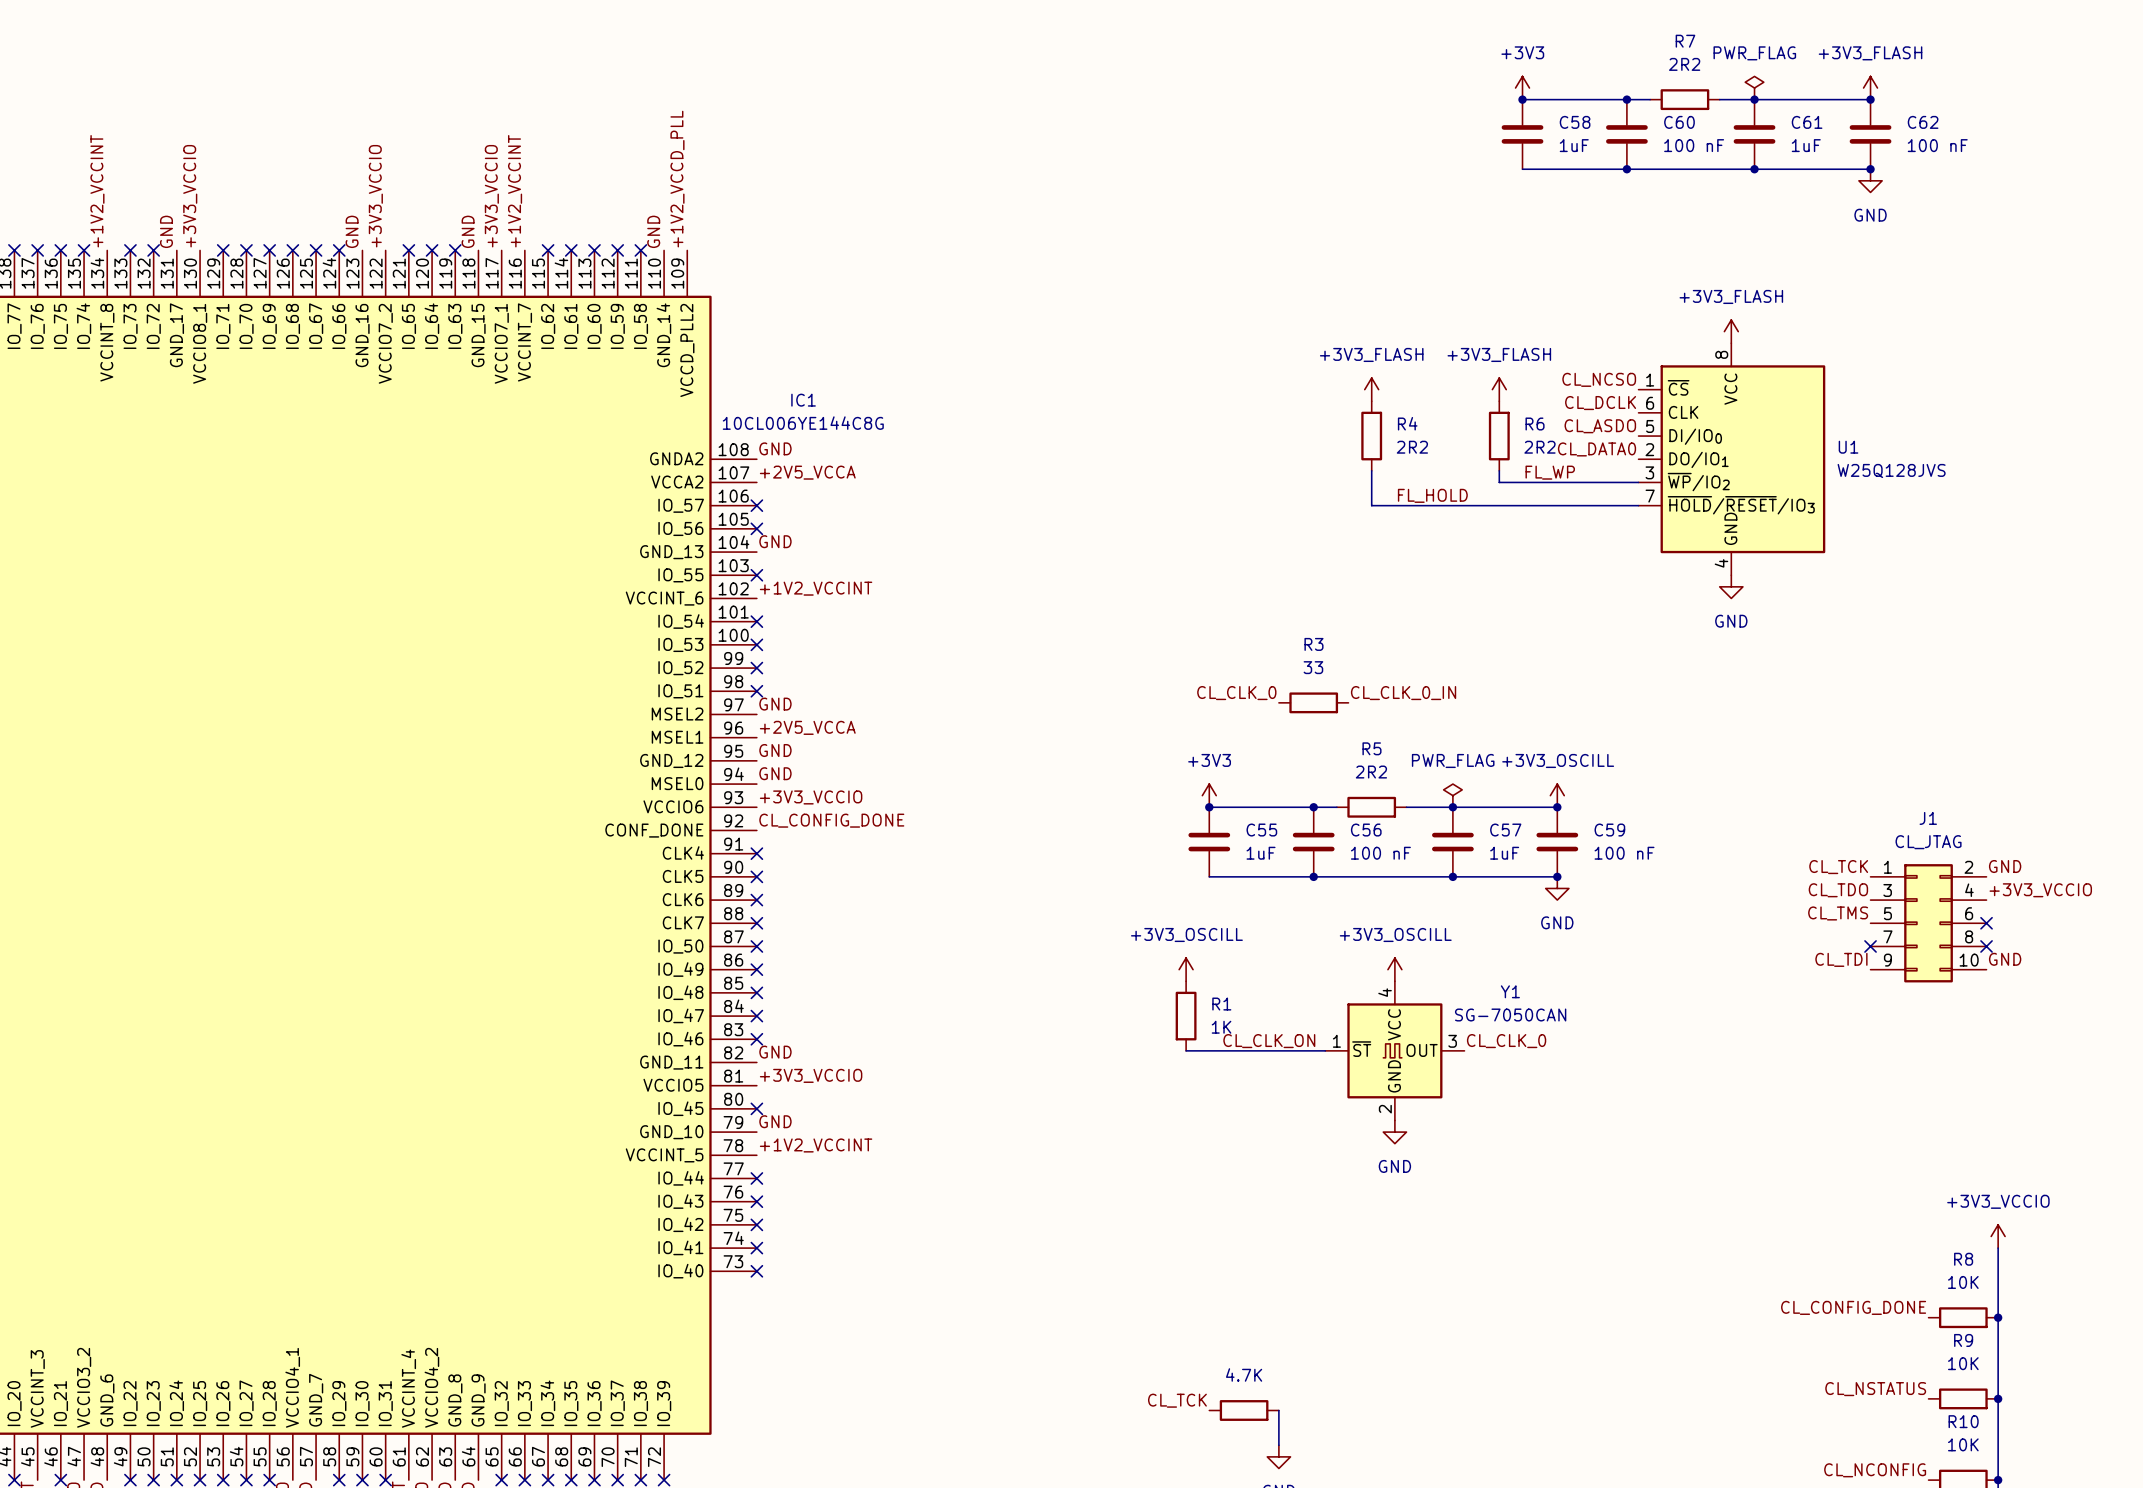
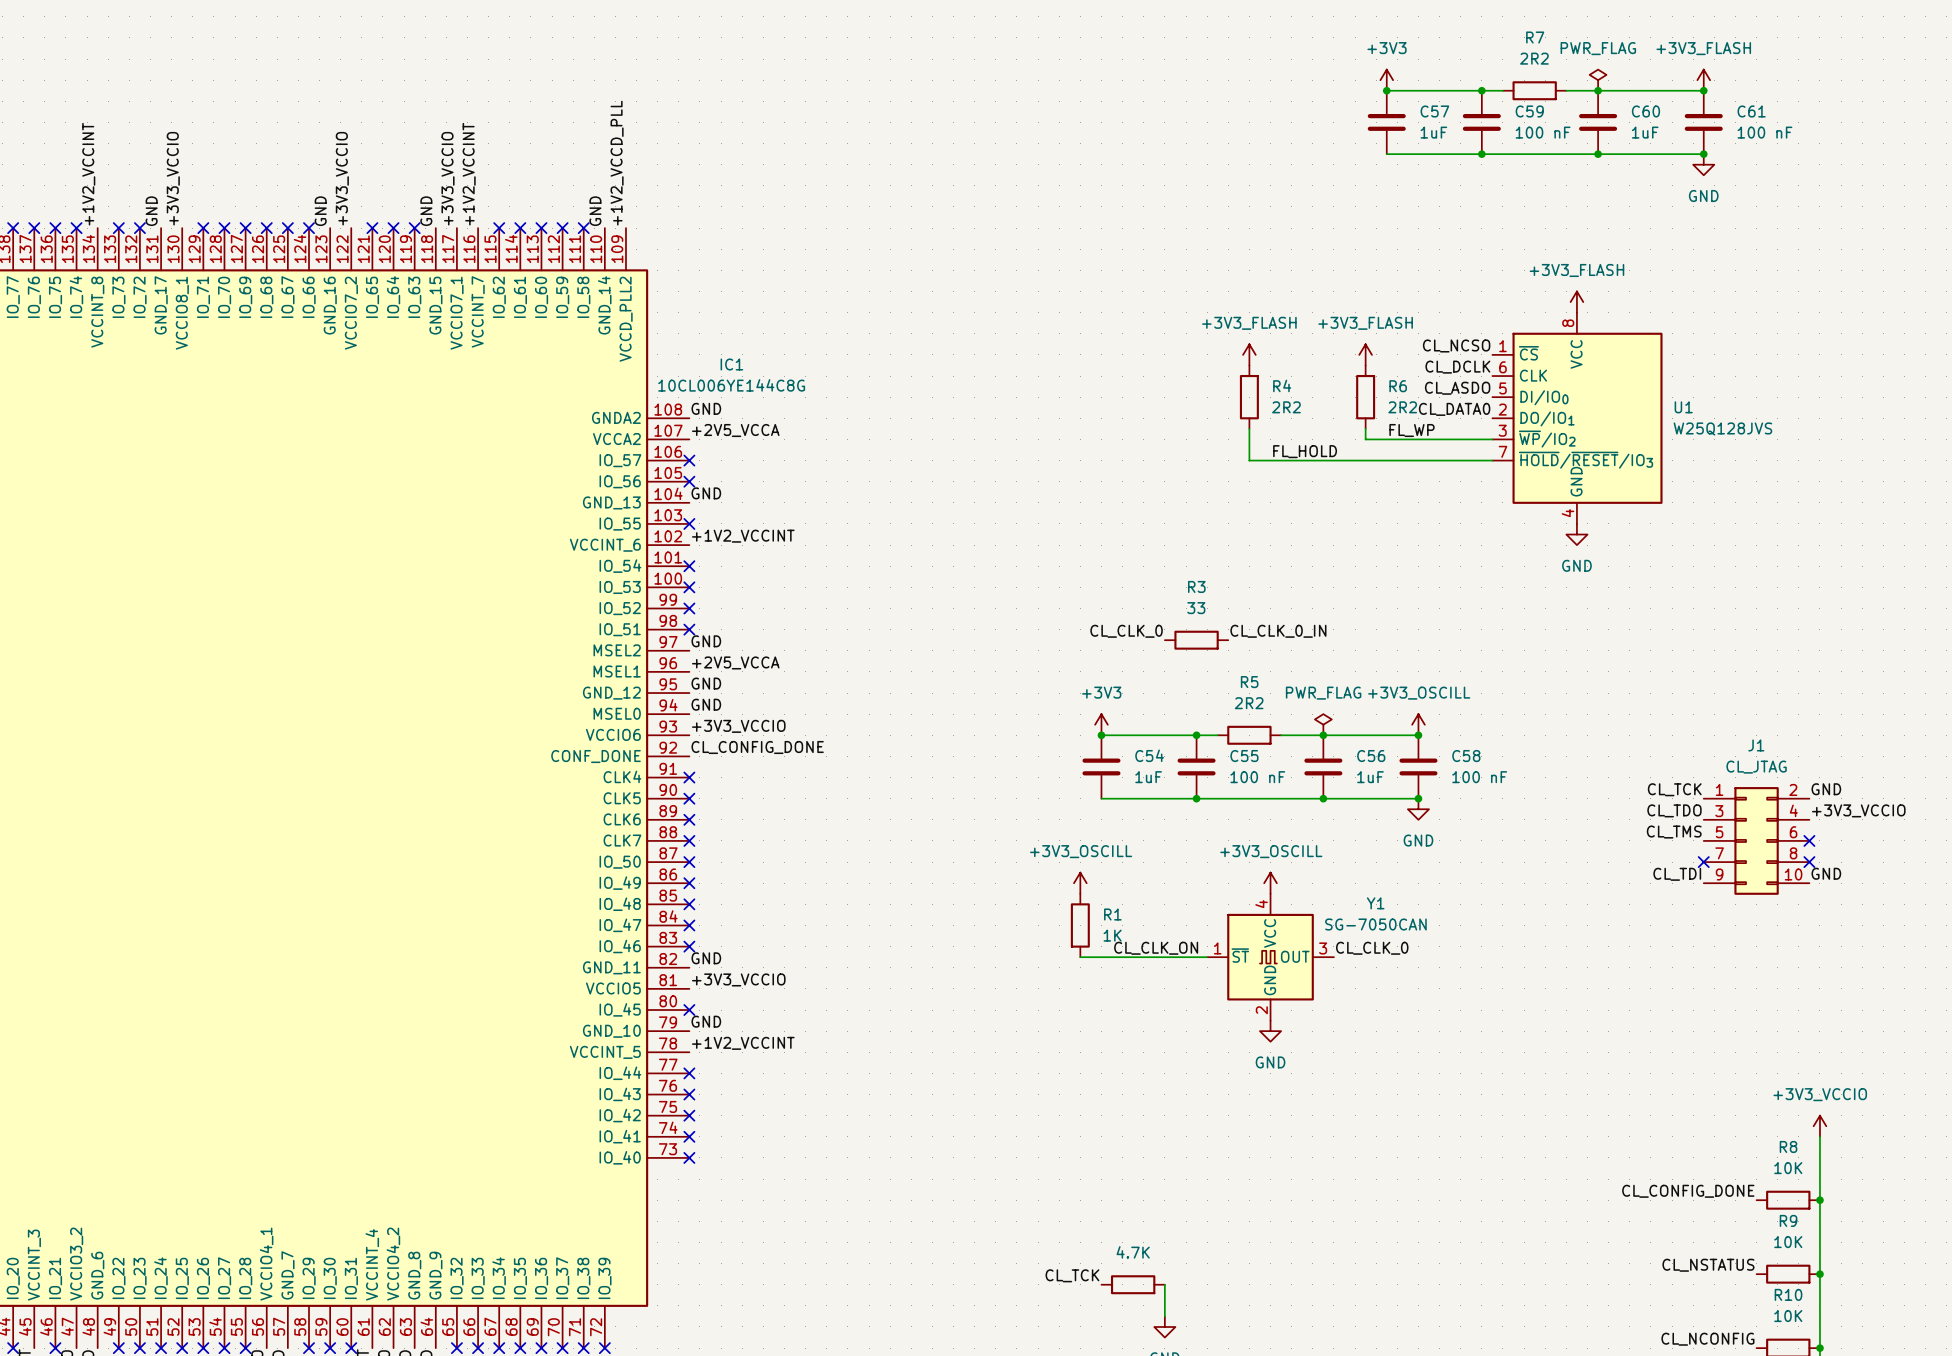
C58 name: C58 (1575, 122) -> C57 (1434, 111)
C60 name: C60 (1679, 122) -> C59 (1529, 111)
C61 name: C61 (1807, 122) -> C60 (1645, 111)
C62 name: C62 (1923, 122) -> C61 (1751, 111)
C55 name: C55 (1261, 830) -> C54 (1149, 755)
C56 name: C56 (1366, 830) -> C55 (1244, 756)
C57 name: C57 (1505, 830) -> C56 (1371, 756)
C59 name: C59 (1609, 830) -> C58 (1466, 756)

